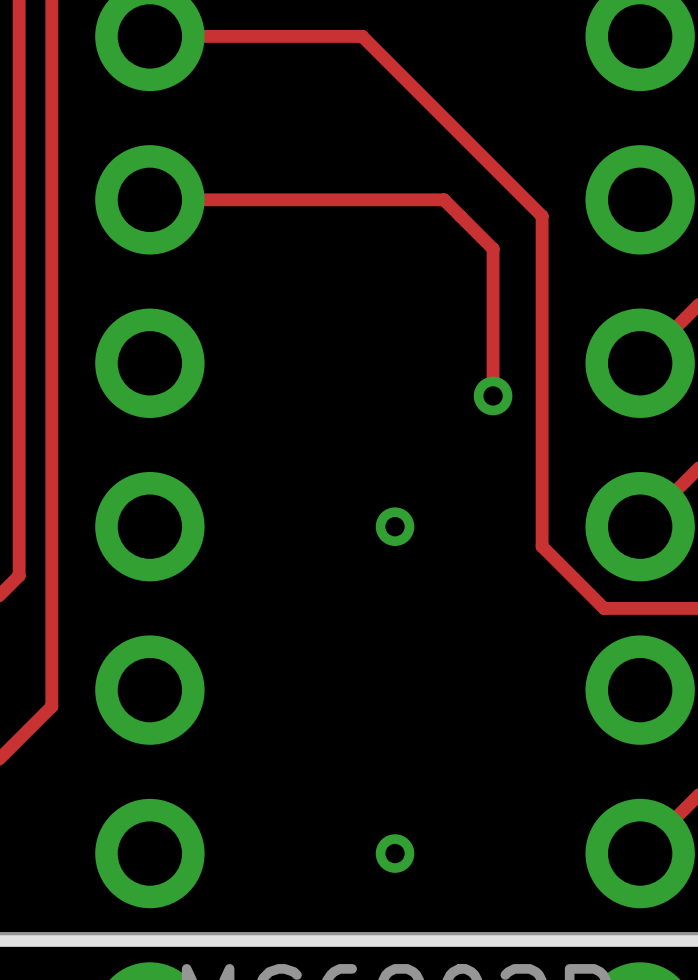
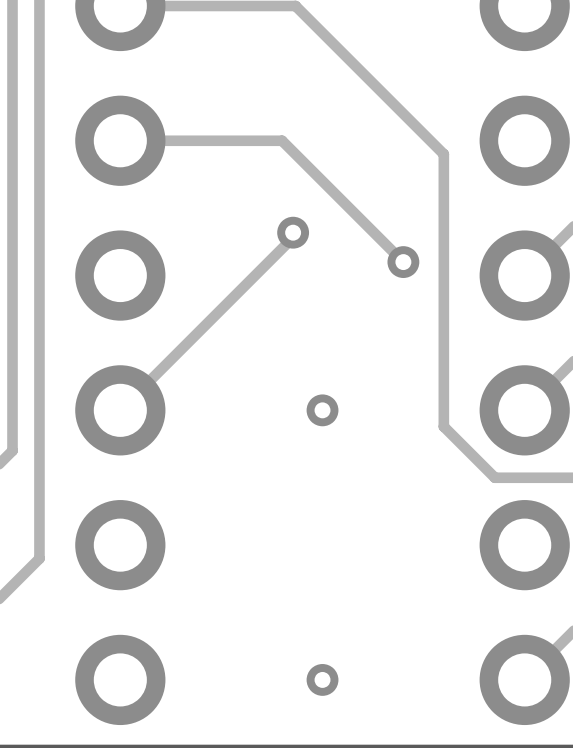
track: (346, 199) (444, 199) (493, 248) (493, 395) -> (282, 140) (403, 262)
track: none -> (293, 232) (293, 237) (120, 410)
via: none -> (293, 232)
via position: (493, 395) -> (403, 262)

